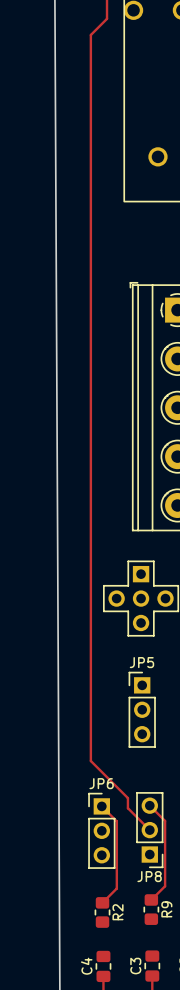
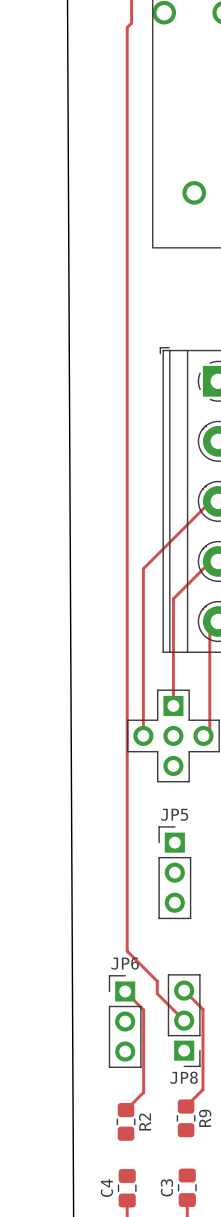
track: (103, 22) (90, 35) (90, 761) (103, 773) -> (127, 27) (127, 951)
track: none -> (209, 502) (143, 568) (143, 735)
track: none -> (209, 562) (173, 598) (173, 705)
track: none -> (209, 622) (209, 729) (203, 735)

